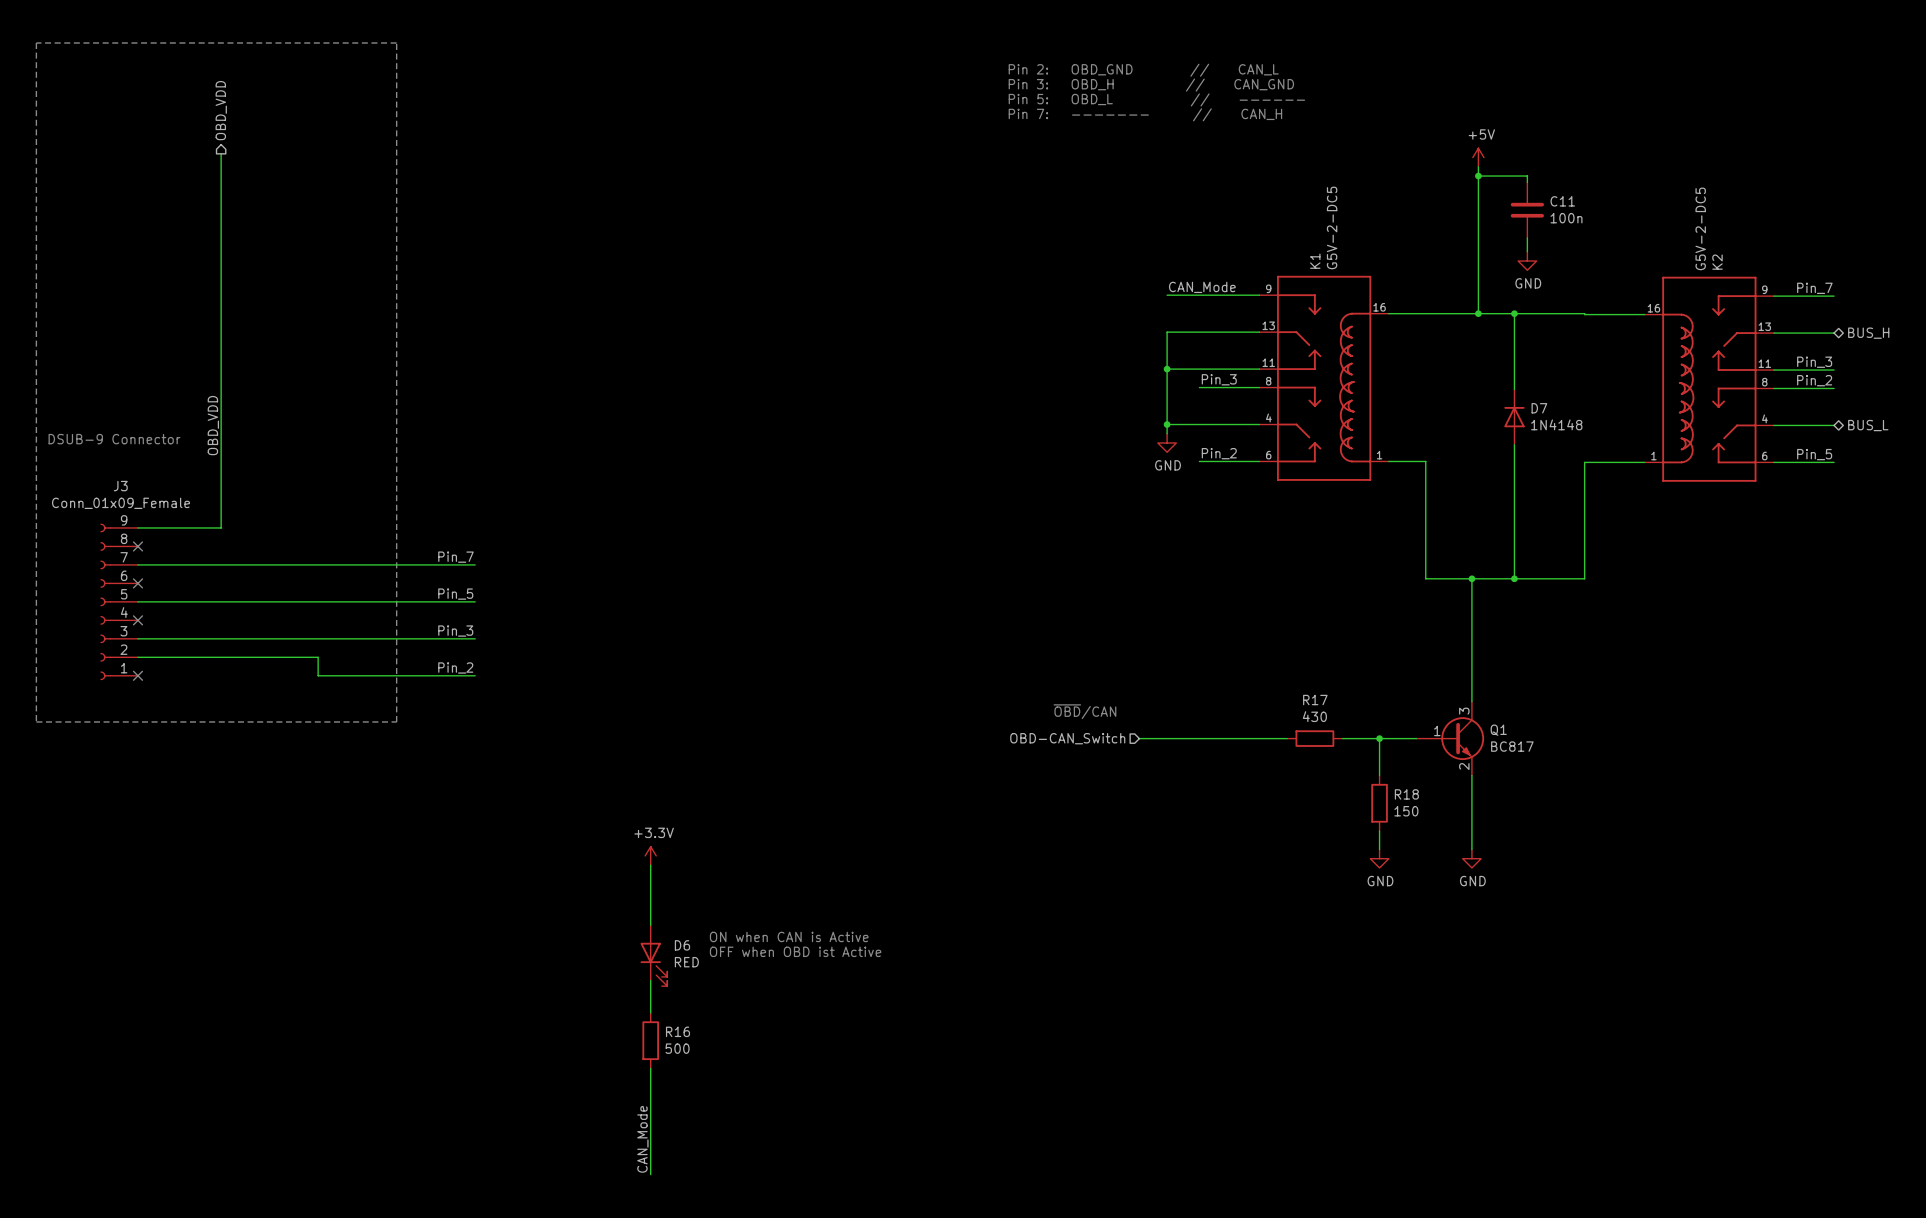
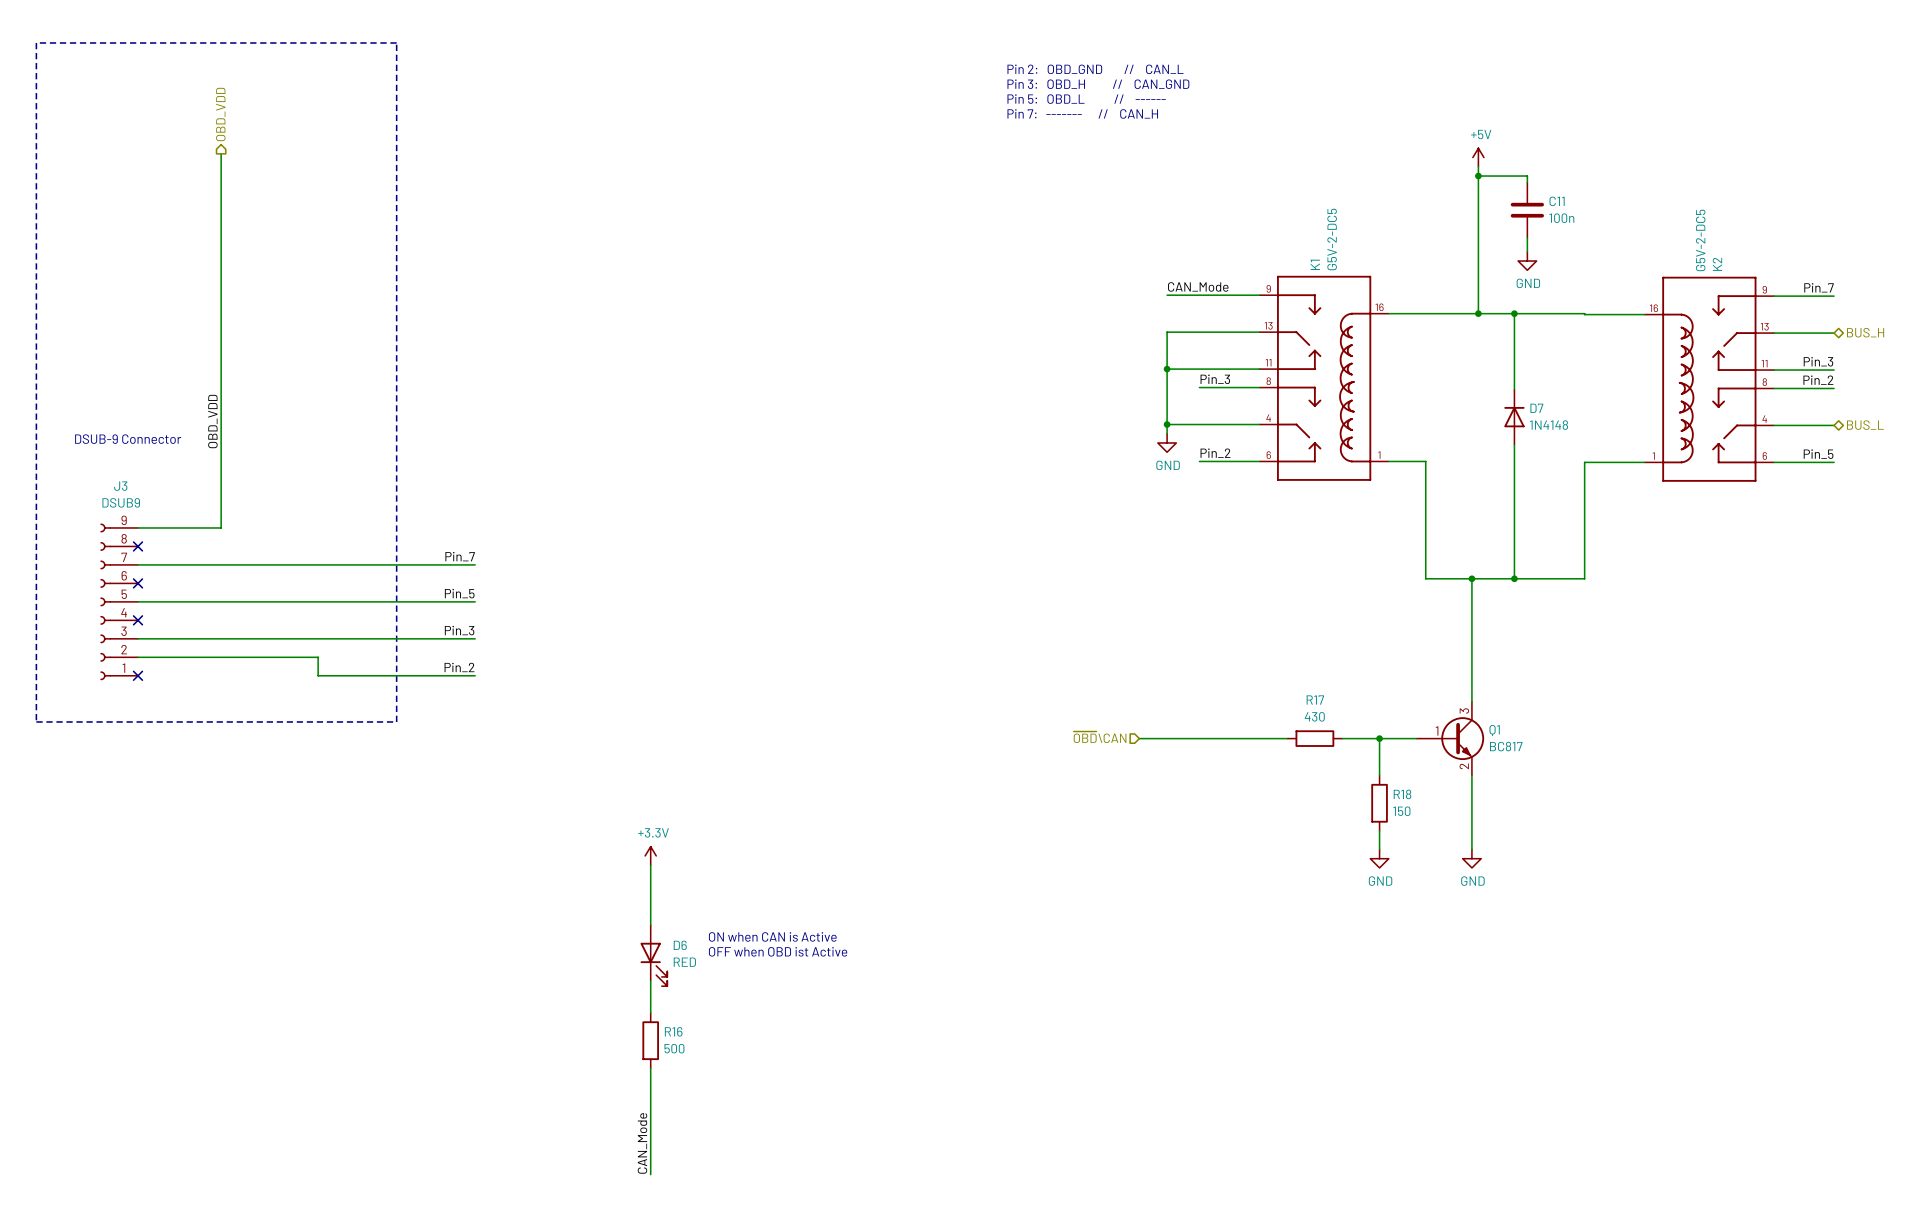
J3 value: Conn_01x09_Female (121, 503) -> DSUB9 (121, 502)
text: ~{OBD}/CAN (1084, 711) -> none
hierarchical label: OBD-CAN_Switch (1067, 738) -> ~{OBD}\CAN (1100, 737)

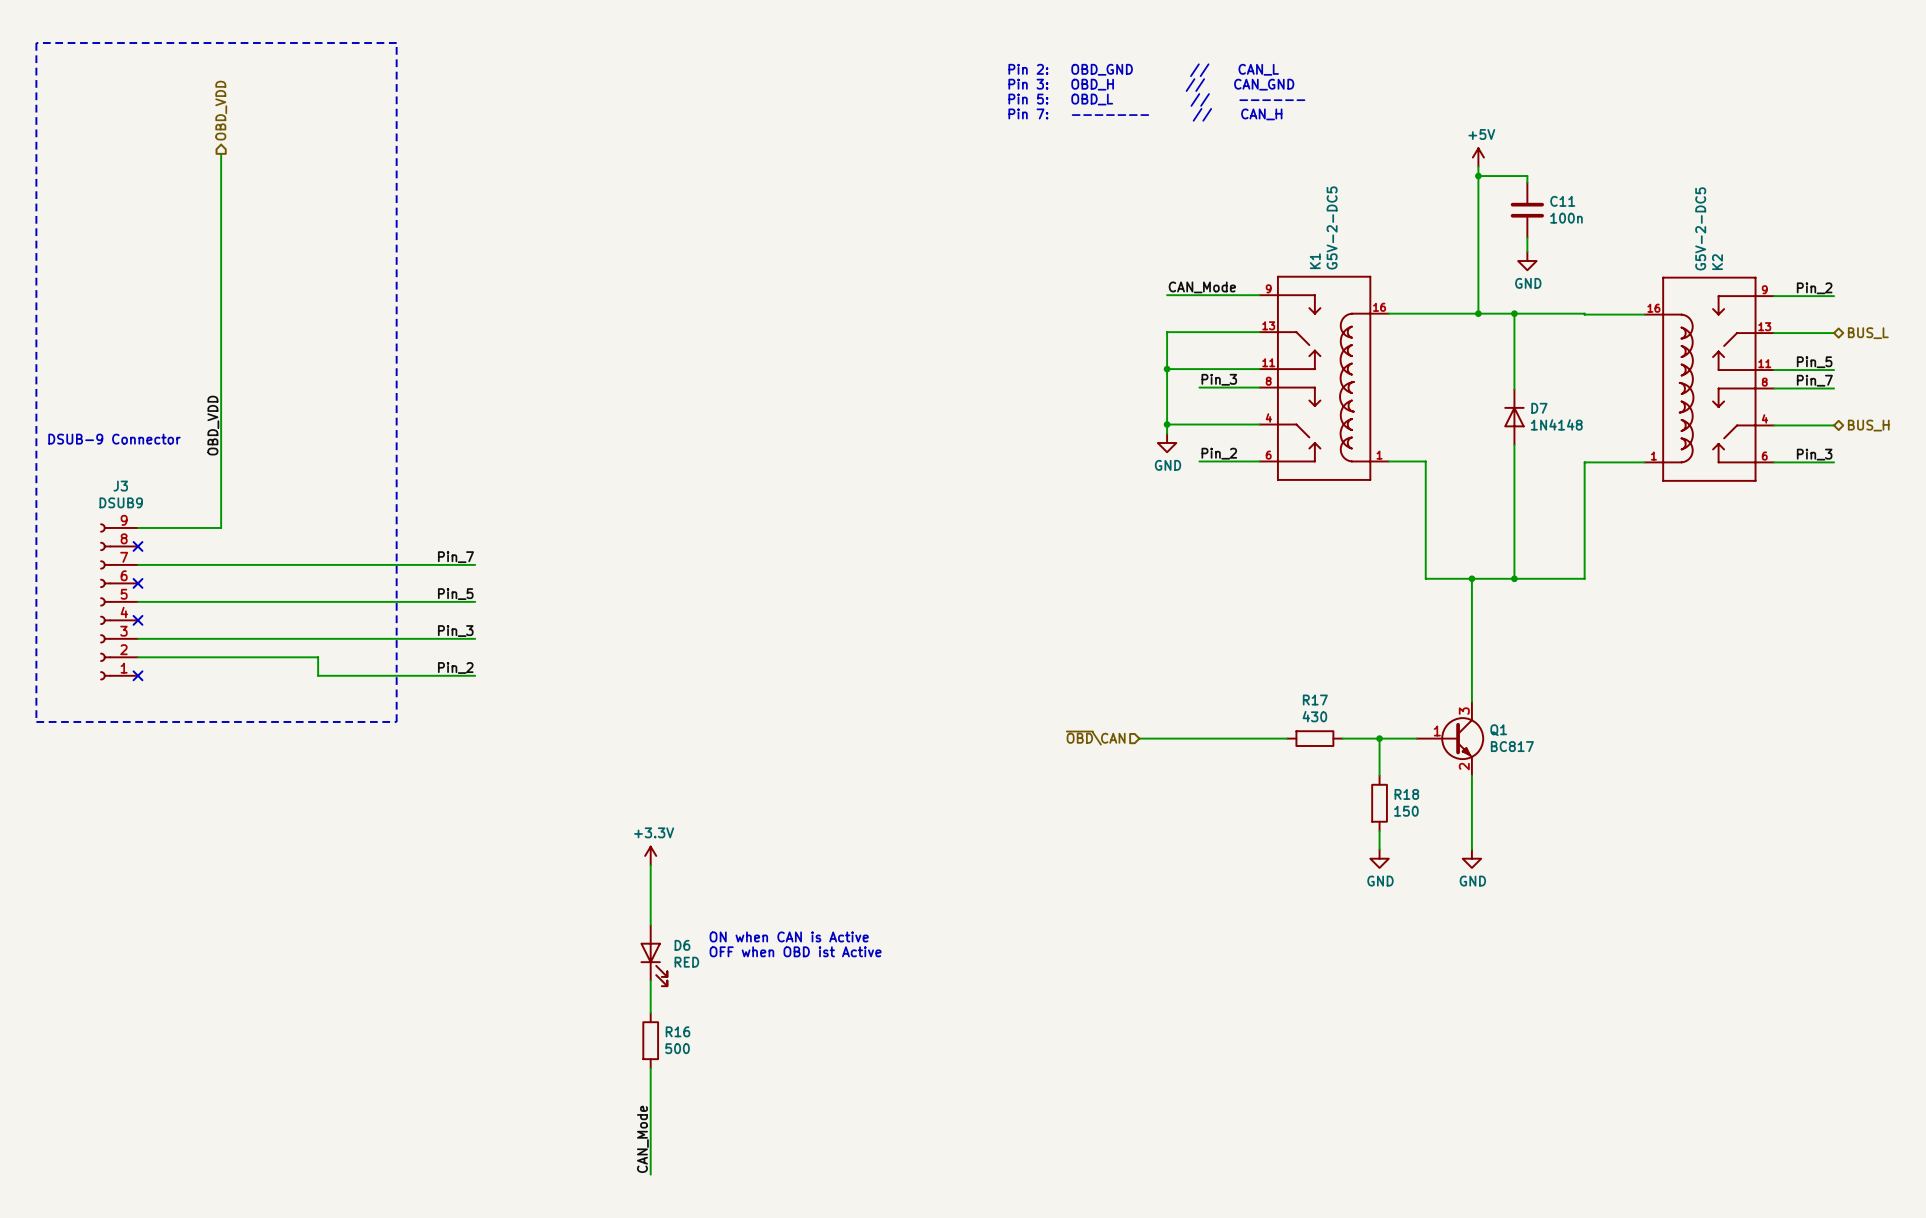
label: Pin_7 (1819, 287) -> Pin_2 (1814, 288)
hierarchical label: BUS_H (1865, 332) -> BUS_L (1868, 333)
label: Pin_3 (1818, 361) -> Pin_5 (1814, 362)
label: Pin_2 (1818, 380) -> Pin_7 (1814, 380)
hierarchical label: BUS_L (1865, 425) -> BUS_H (1868, 425)
label: Pin_5 (1818, 454) -> Pin_3 (1814, 454)

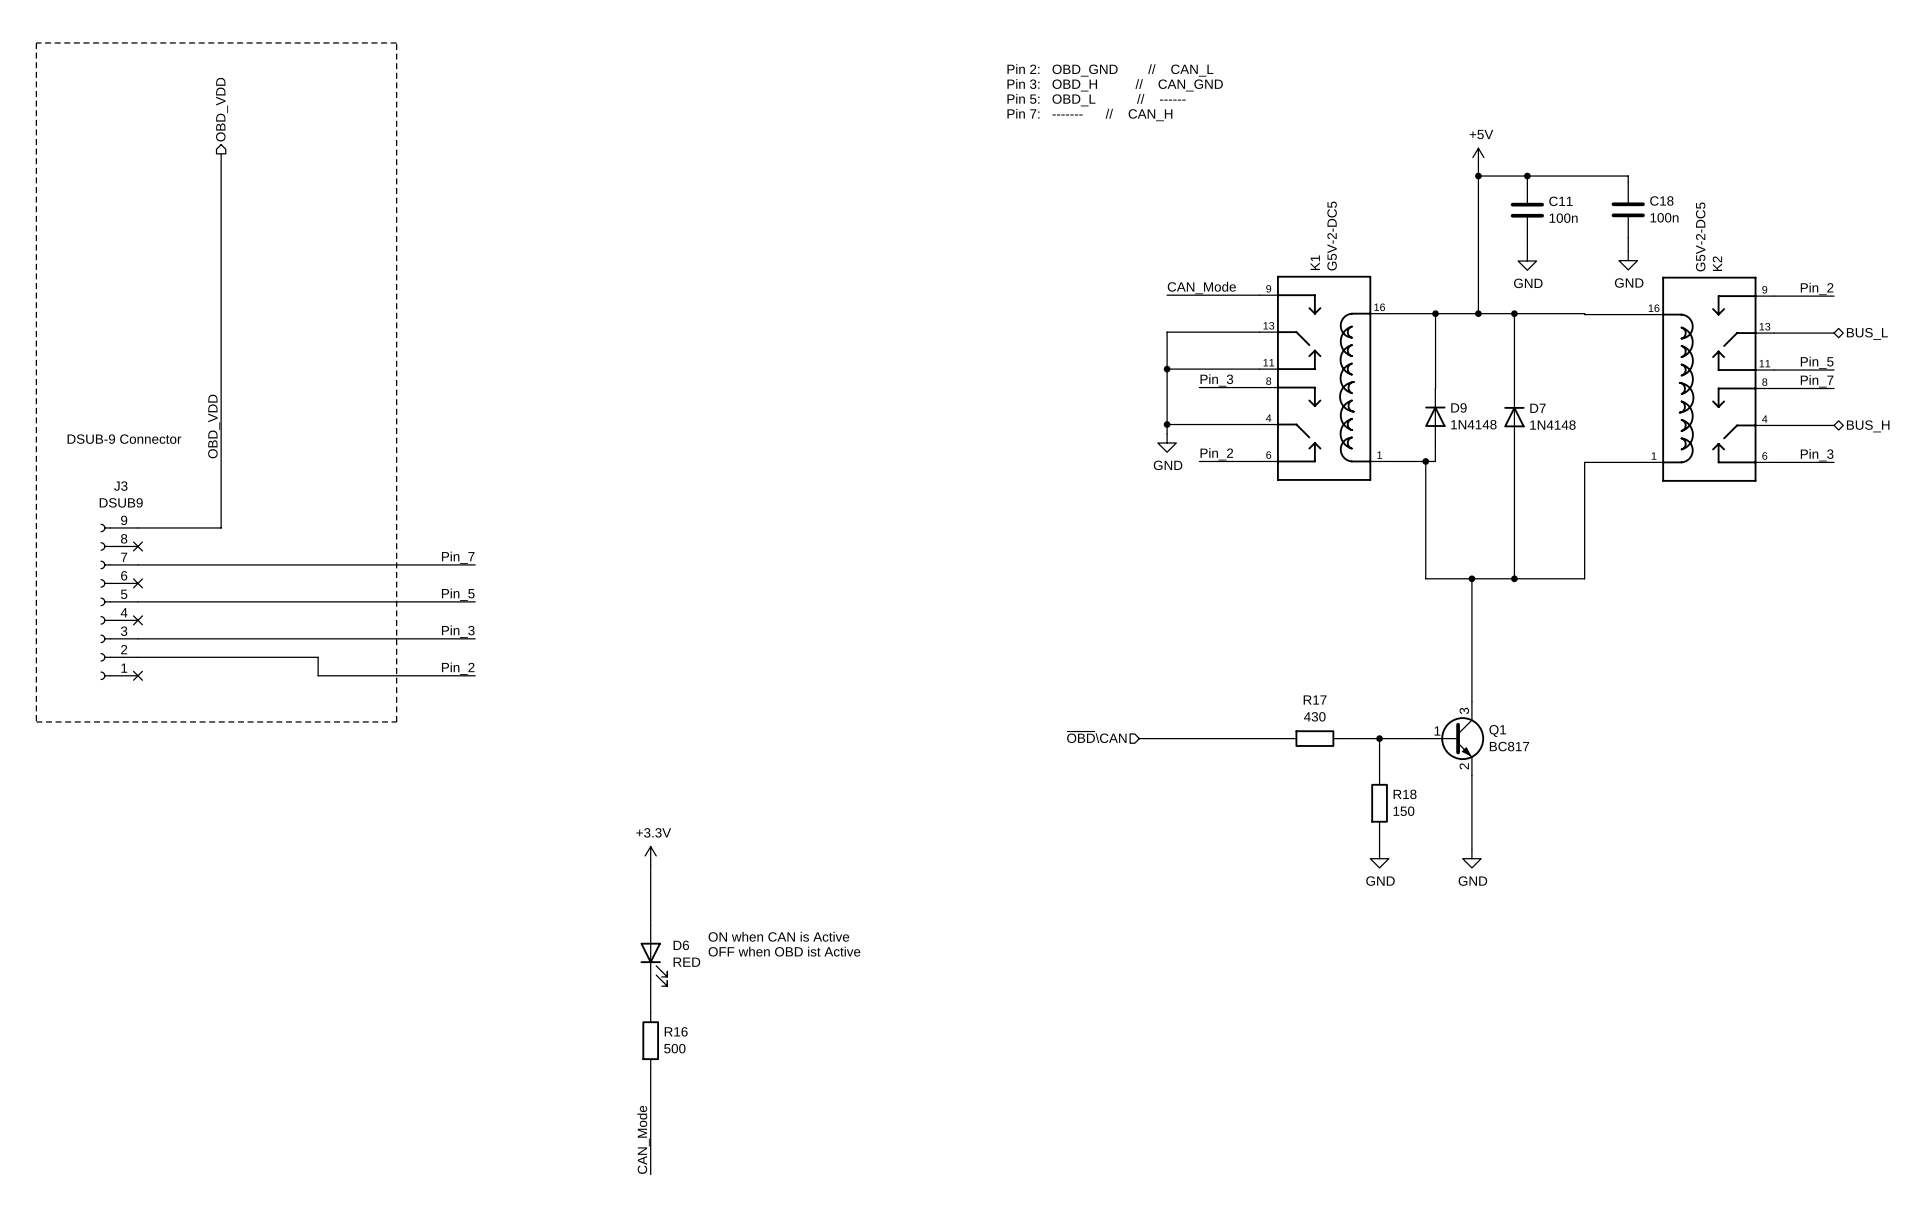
wire: none -> (1527, 176) (1628, 176) (1628, 182)
junction: none -> (1527, 176)
C18: none -> 100n (1628, 209)
wire: none -> (1628, 237) (1628, 251)
power symbol: none -> GND (1628, 260)
wire: none -> (1435, 313) (1435, 389)
junction: none -> (1435, 313)
D9: none -> 1N4148 (1435, 416)
wire: none -> (1435, 444) (1435, 461) (1425, 461)
junction: none -> (1425, 461)

